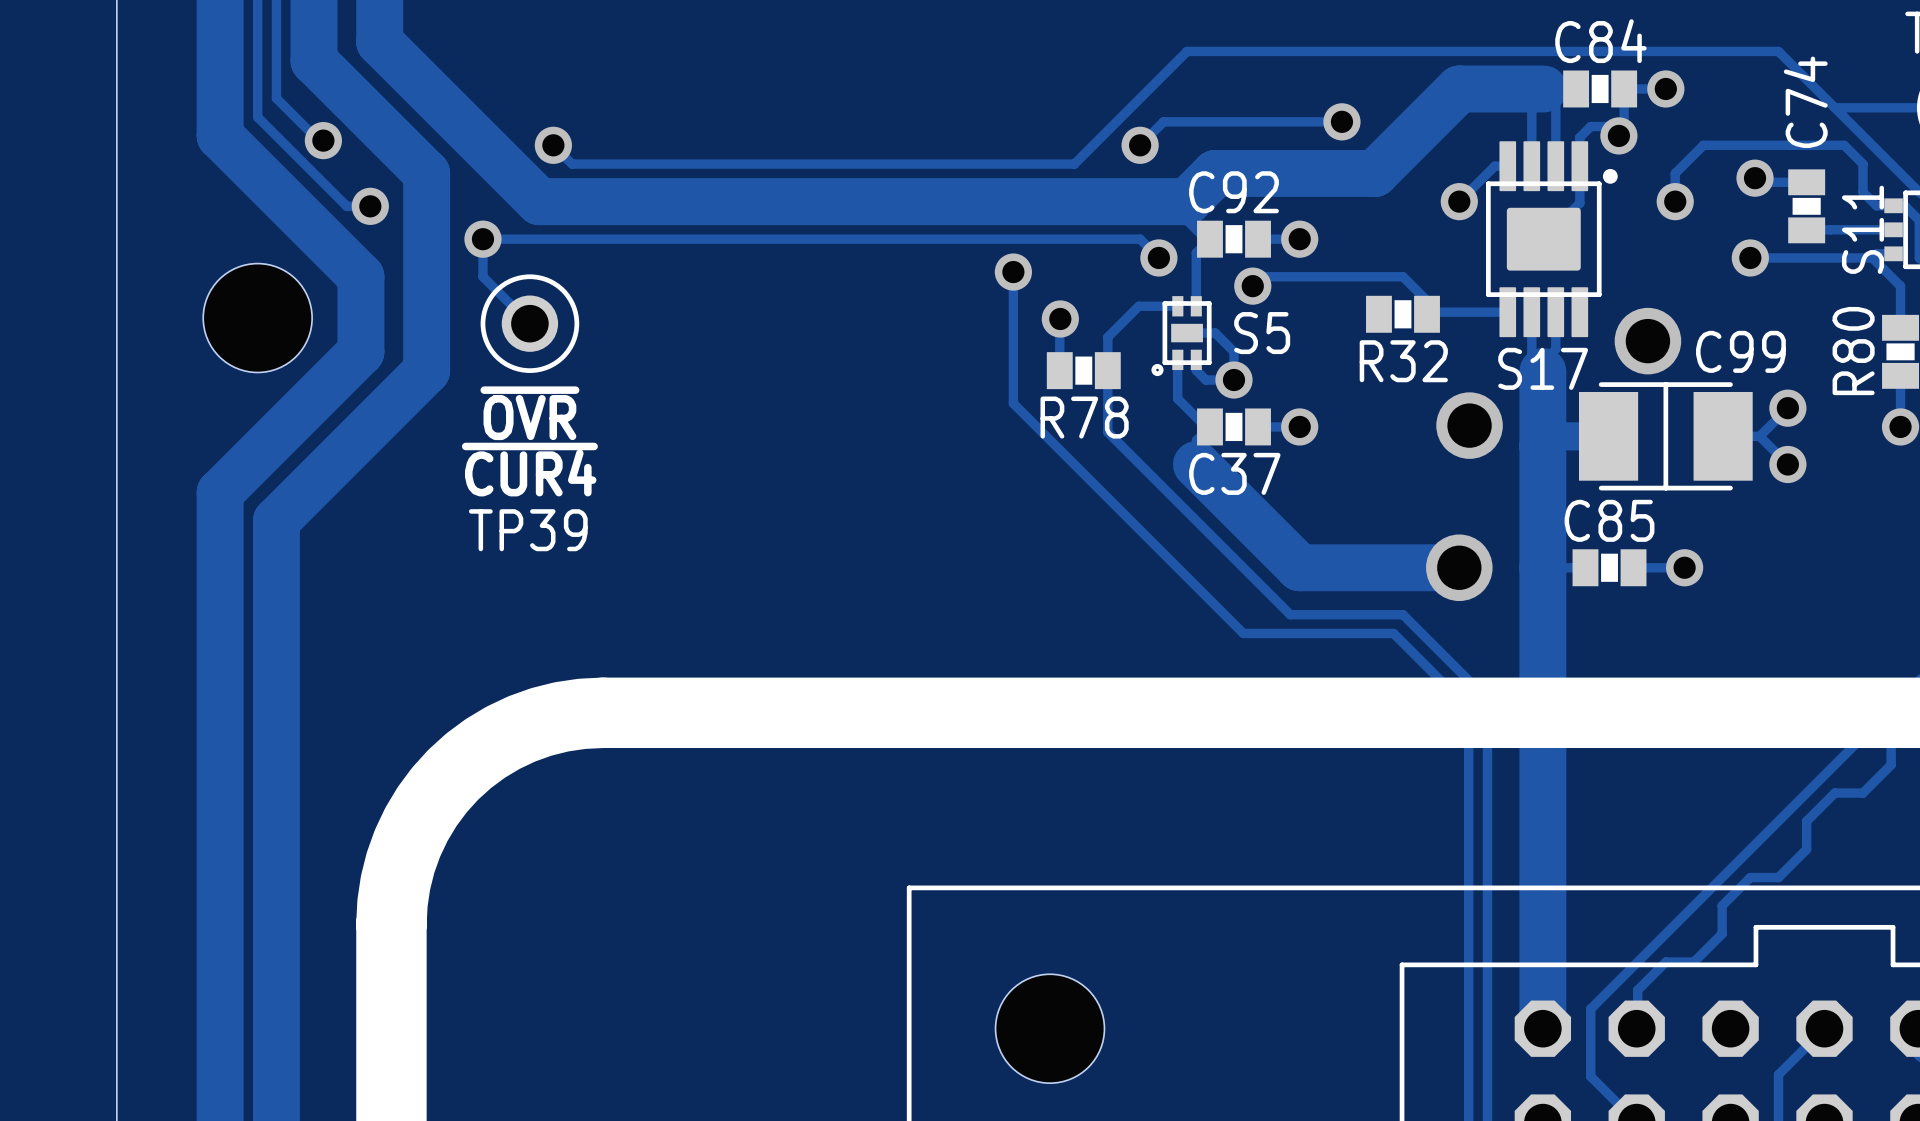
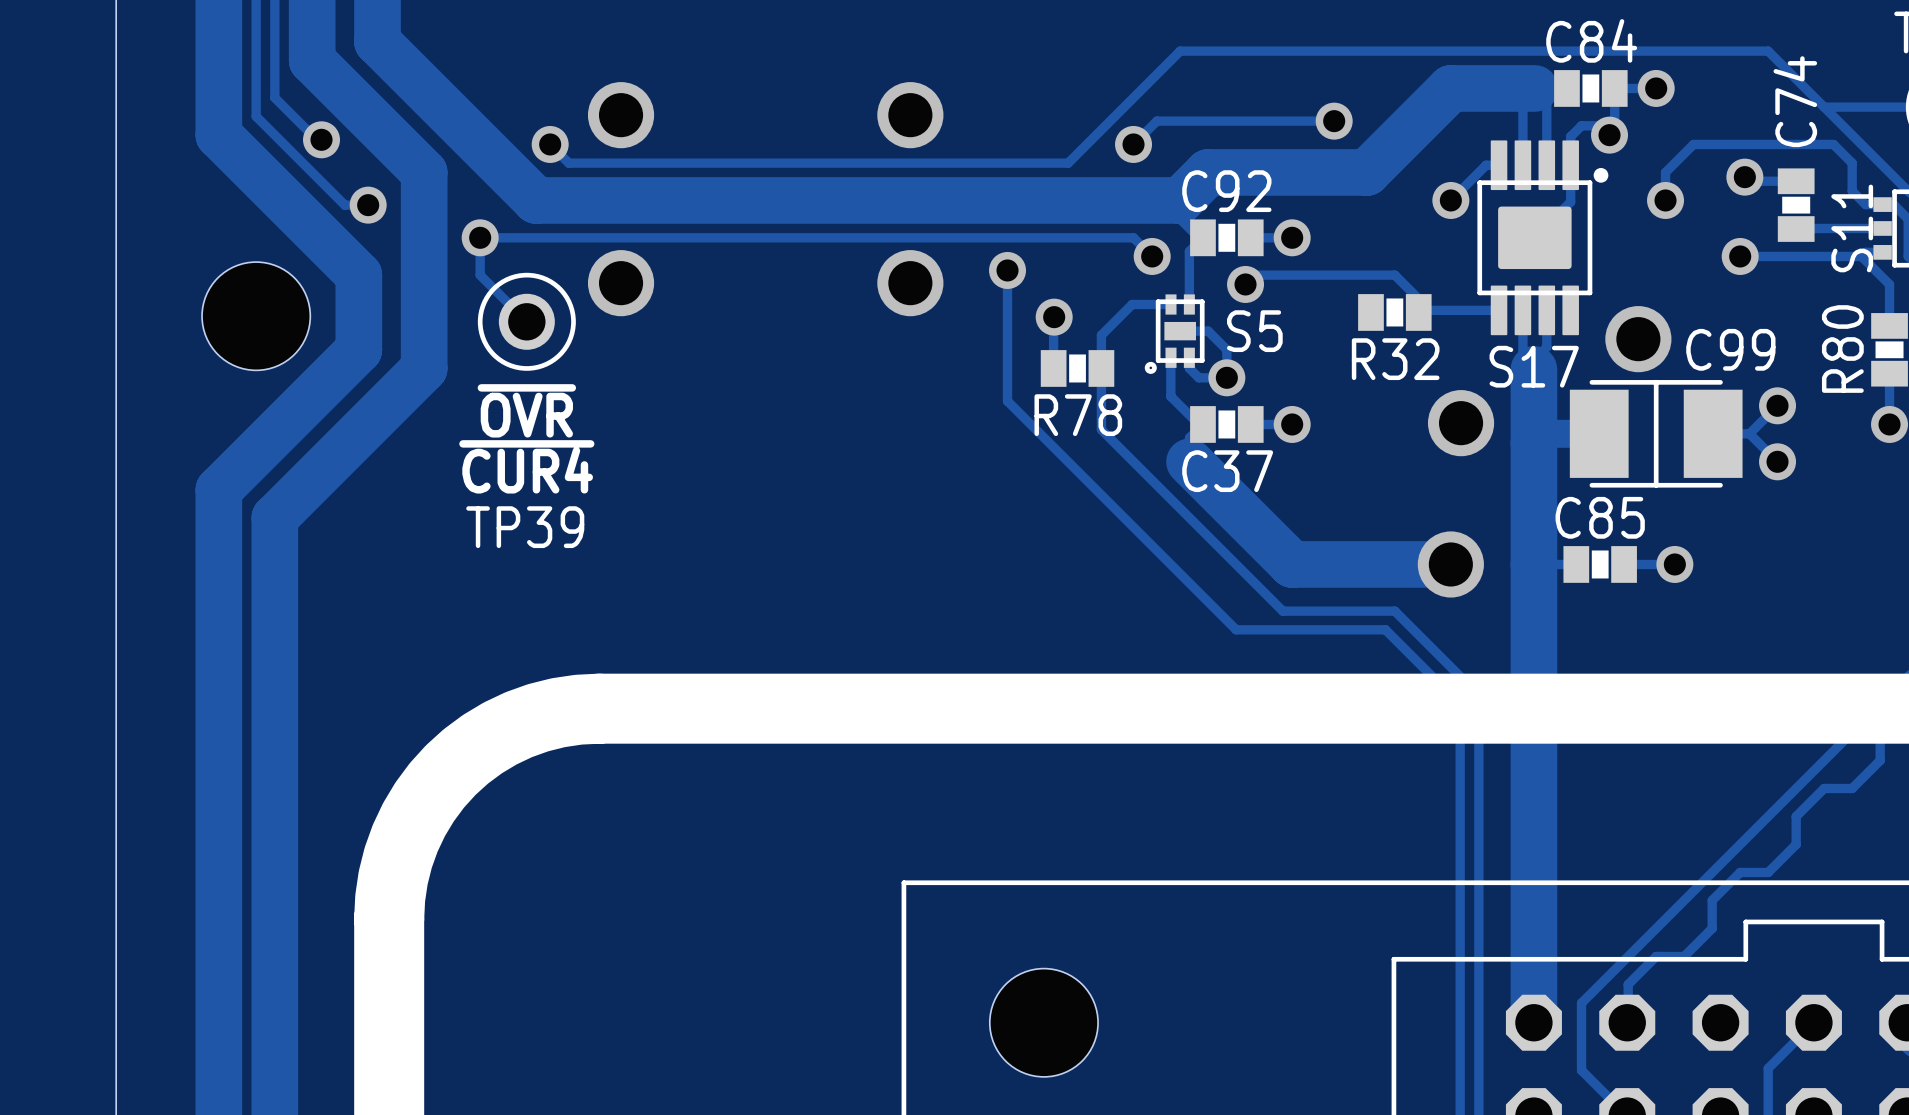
via: none -> (621, 115)
via: none -> (910, 115)
via: none -> (621, 283)
via: none -> (910, 283)

